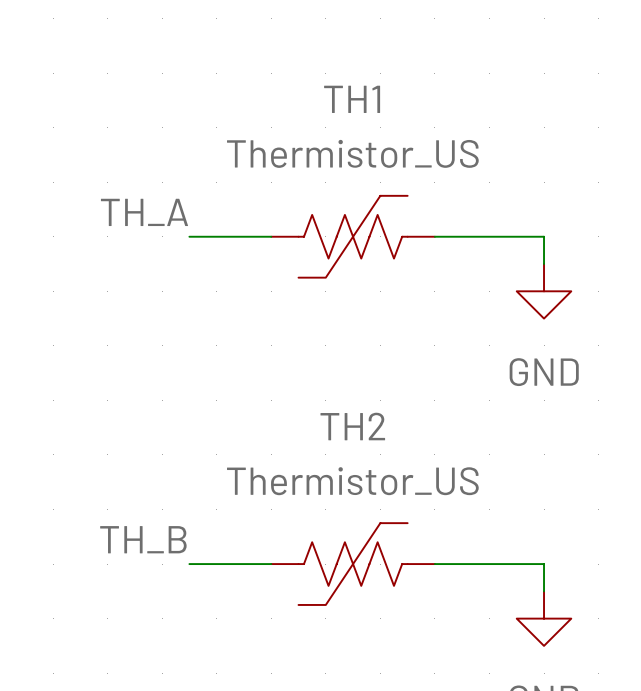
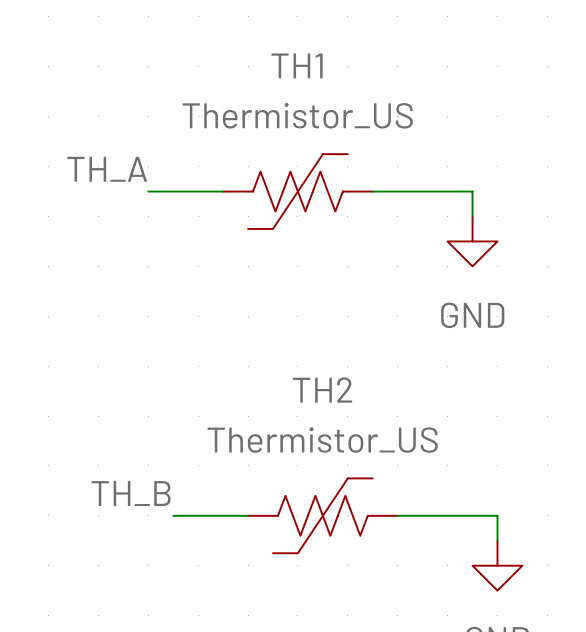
label position: TH_A (144, 212) -> TH_A (107, 169)
wire: (189, 236) (271, 236) -> (148, 191) (223, 191)
TH1 position: (353, 236) -> (297, 191)
wire: (434, 236) (544, 236) (544, 264) -> (372, 191) (472, 191) (472, 216)
power symbol position: GND (544, 291) -> GND (472, 241)

